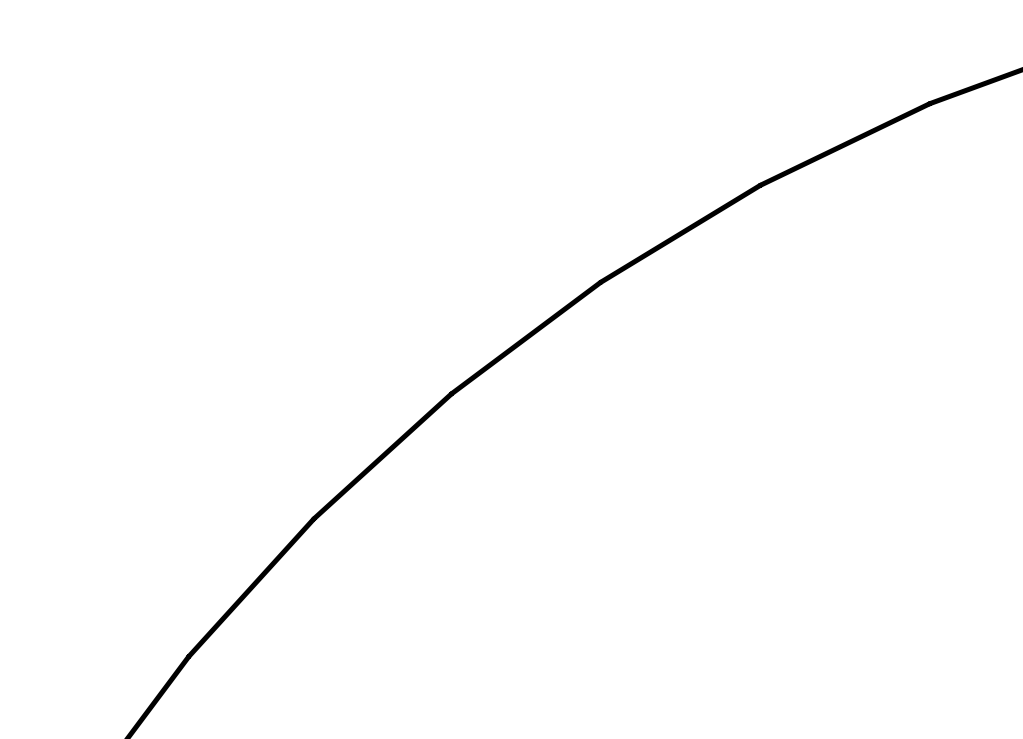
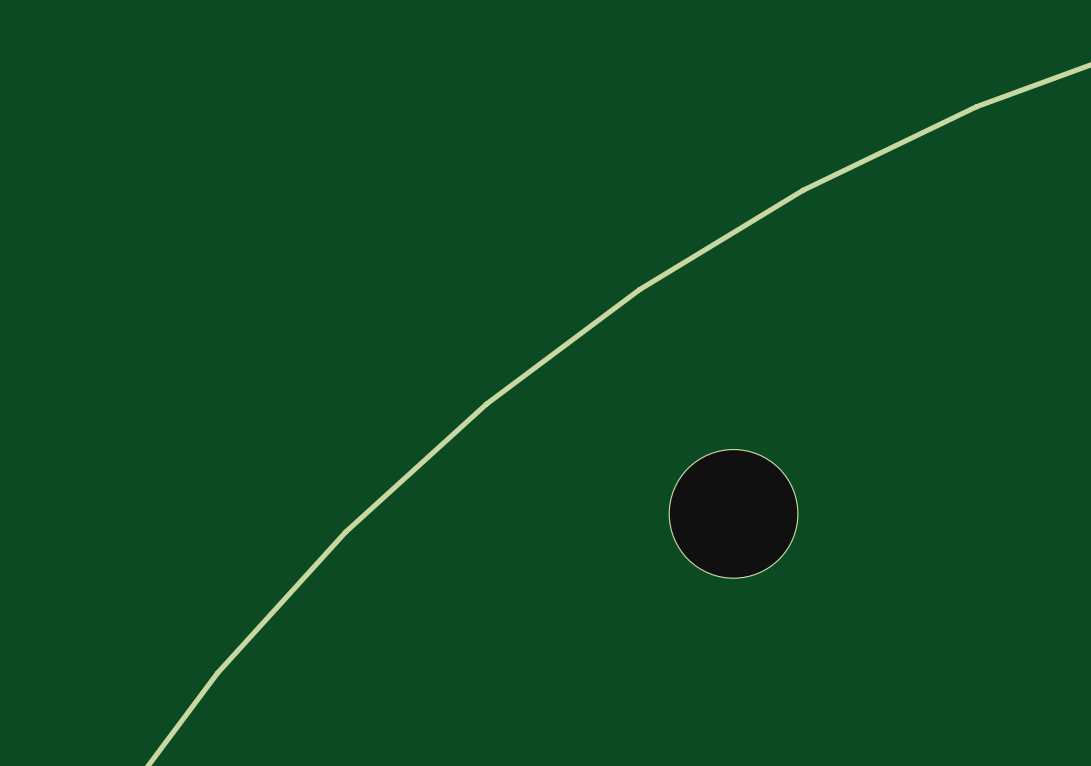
part: none -> (733, 513)

